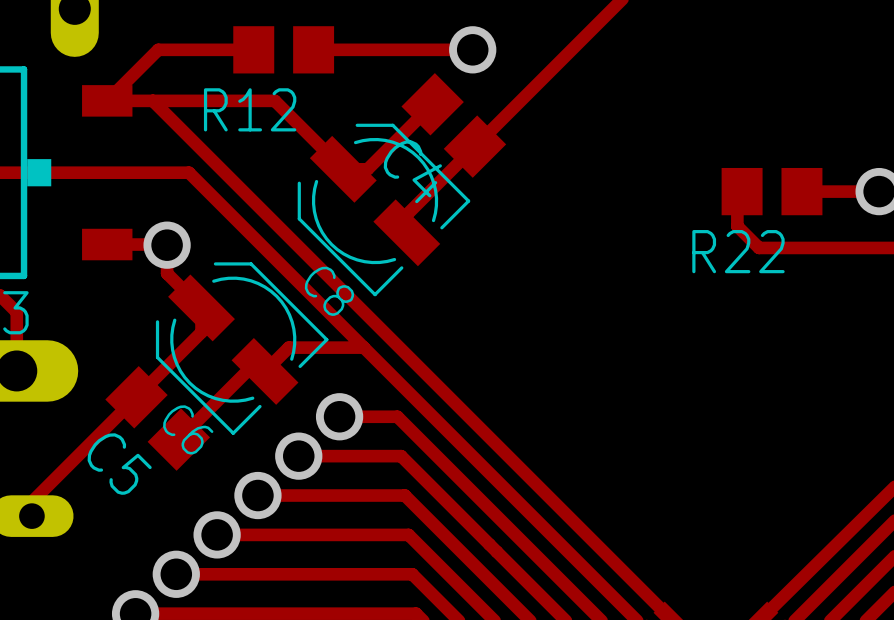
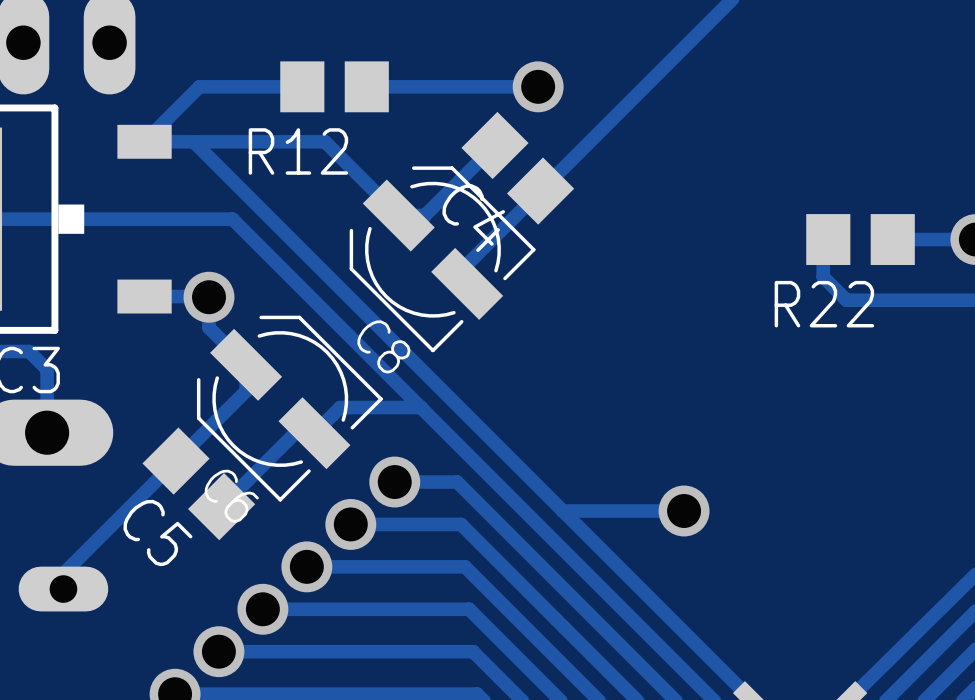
track: none -> (562, 510) (684, 510)
via: none -> (684, 510)

